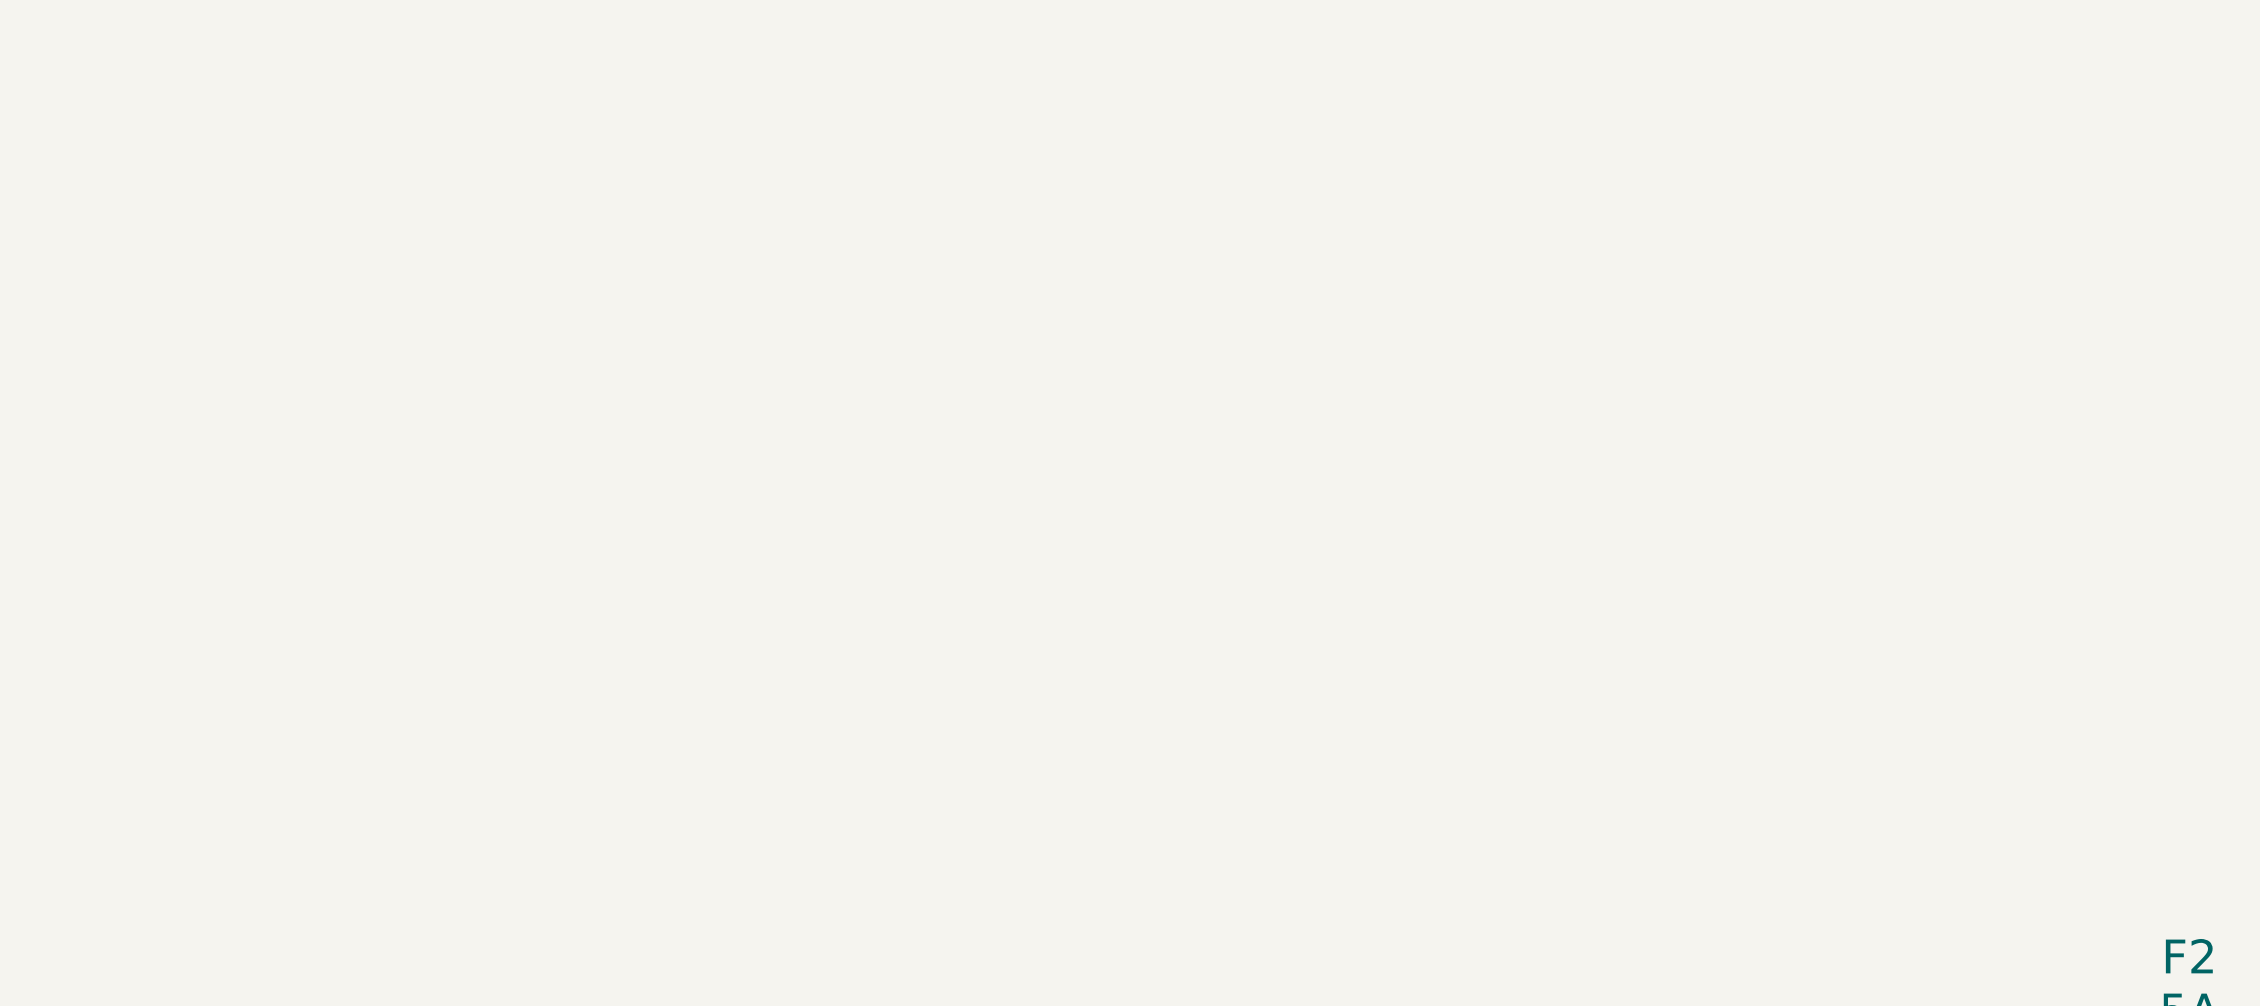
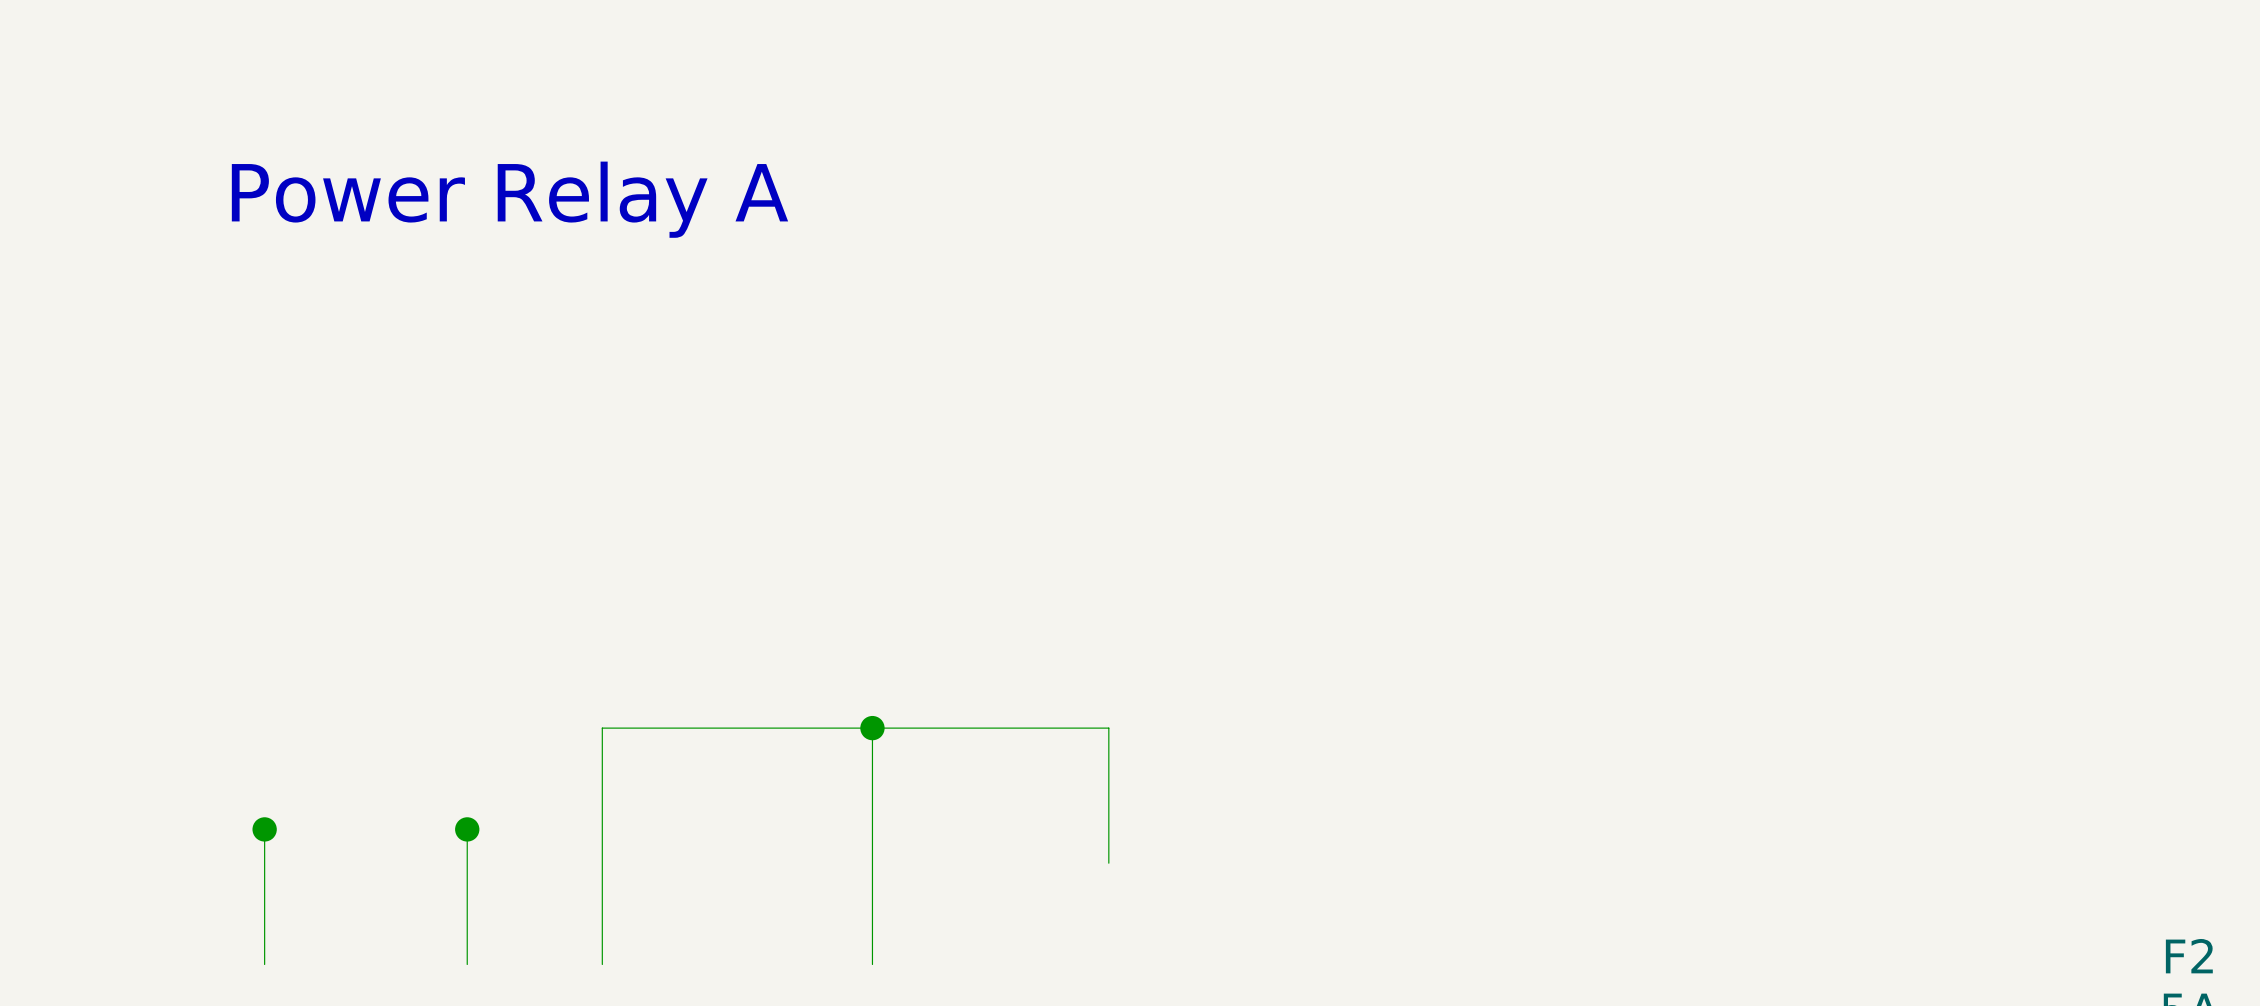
text: none -> Power Relay A (509, 199)
wire: none -> (872, 728) (872, 964)
junction: none -> (872, 728)
wire: none -> (264, 829) (264, 964)
junction: none -> (264, 829)
wire: none -> (467, 829) (467, 964)
junction: none -> (467, 829)
wire: none -> (1108, 863) (1108, 728) (602, 728) (602, 964)

